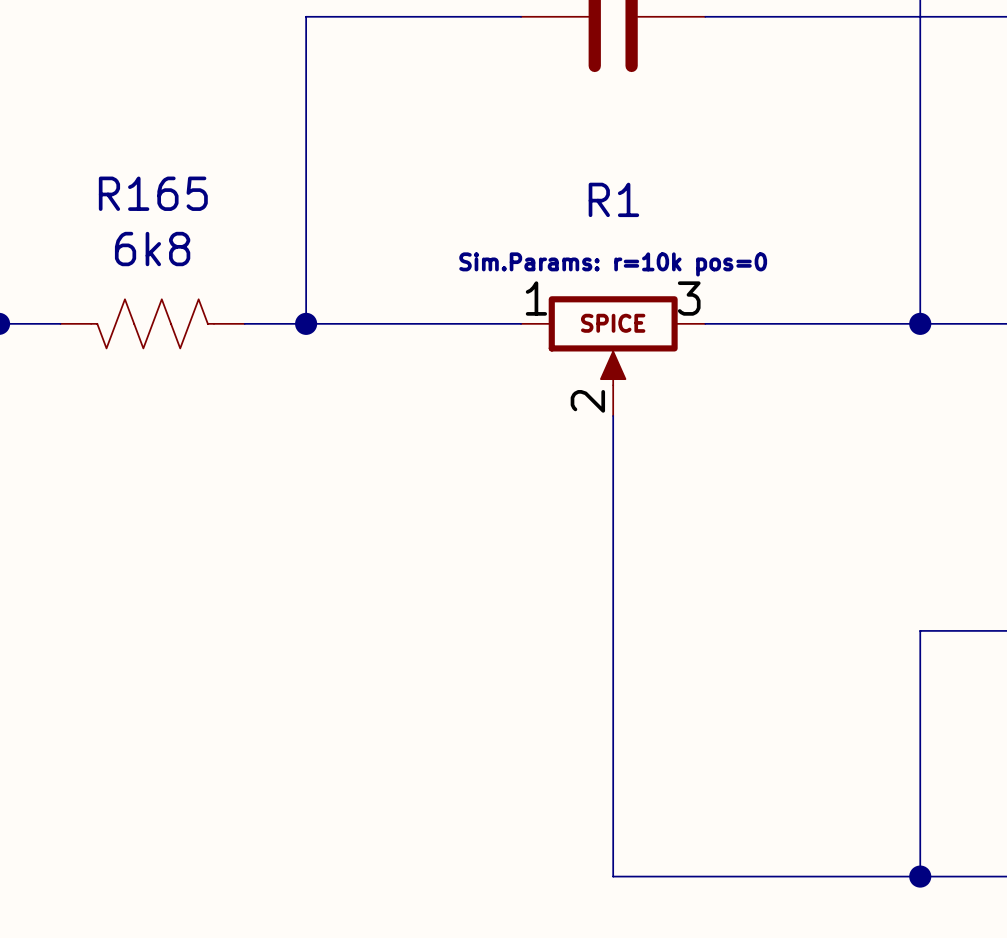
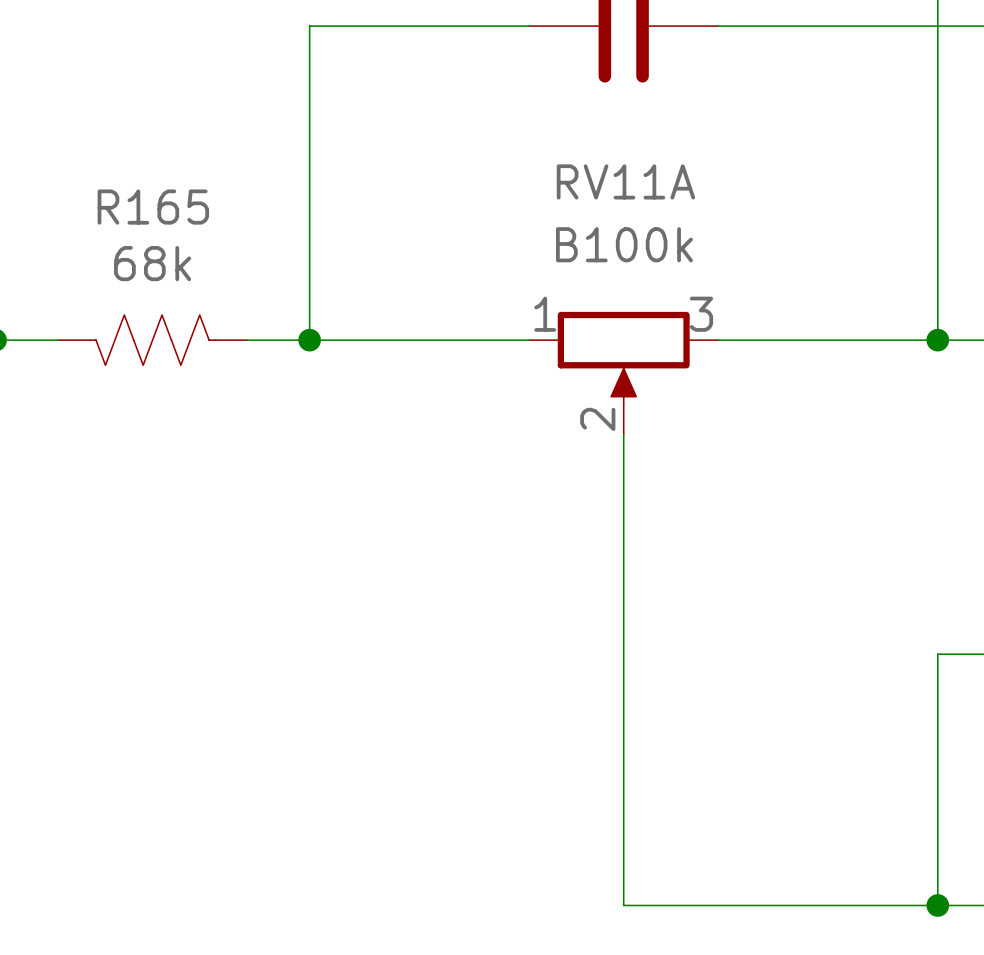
R1 name: R1 (613, 199) -> RV11A (625, 181)
R1 value: none -> B100k (624, 244)
R165 value: 6k8 (152, 249) -> 68k (152, 263)
R1 text: Sim.Params: r=10k pos=0 (613, 264) -> none
R1 text: SPICE (613, 323) -> none

